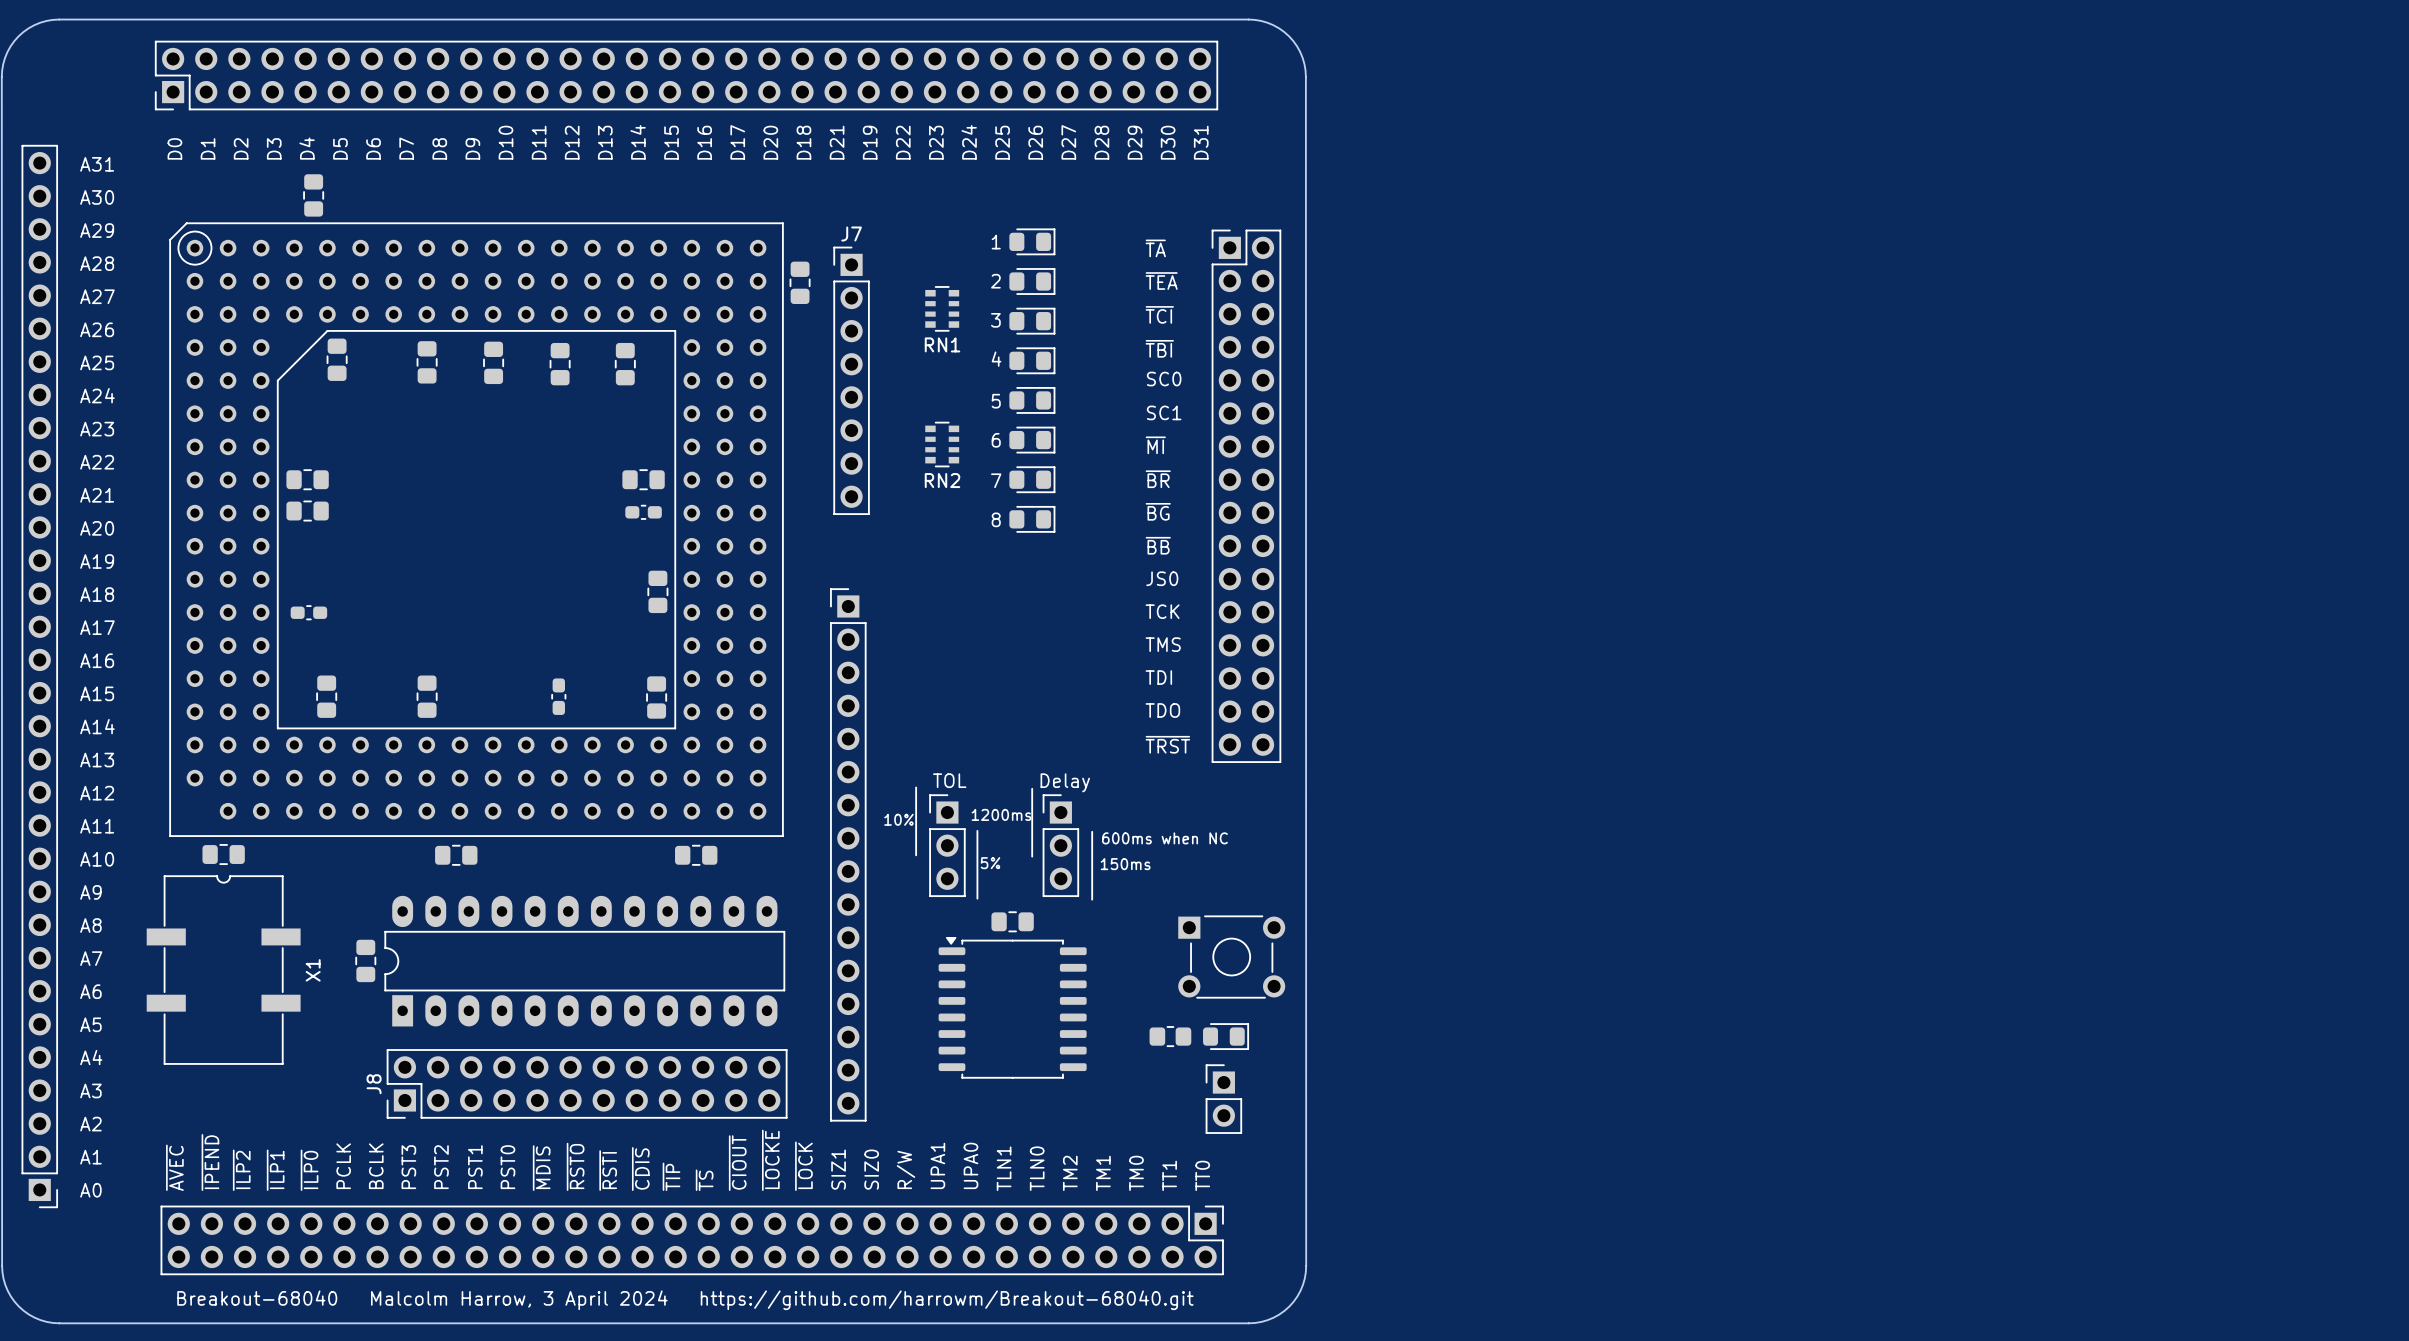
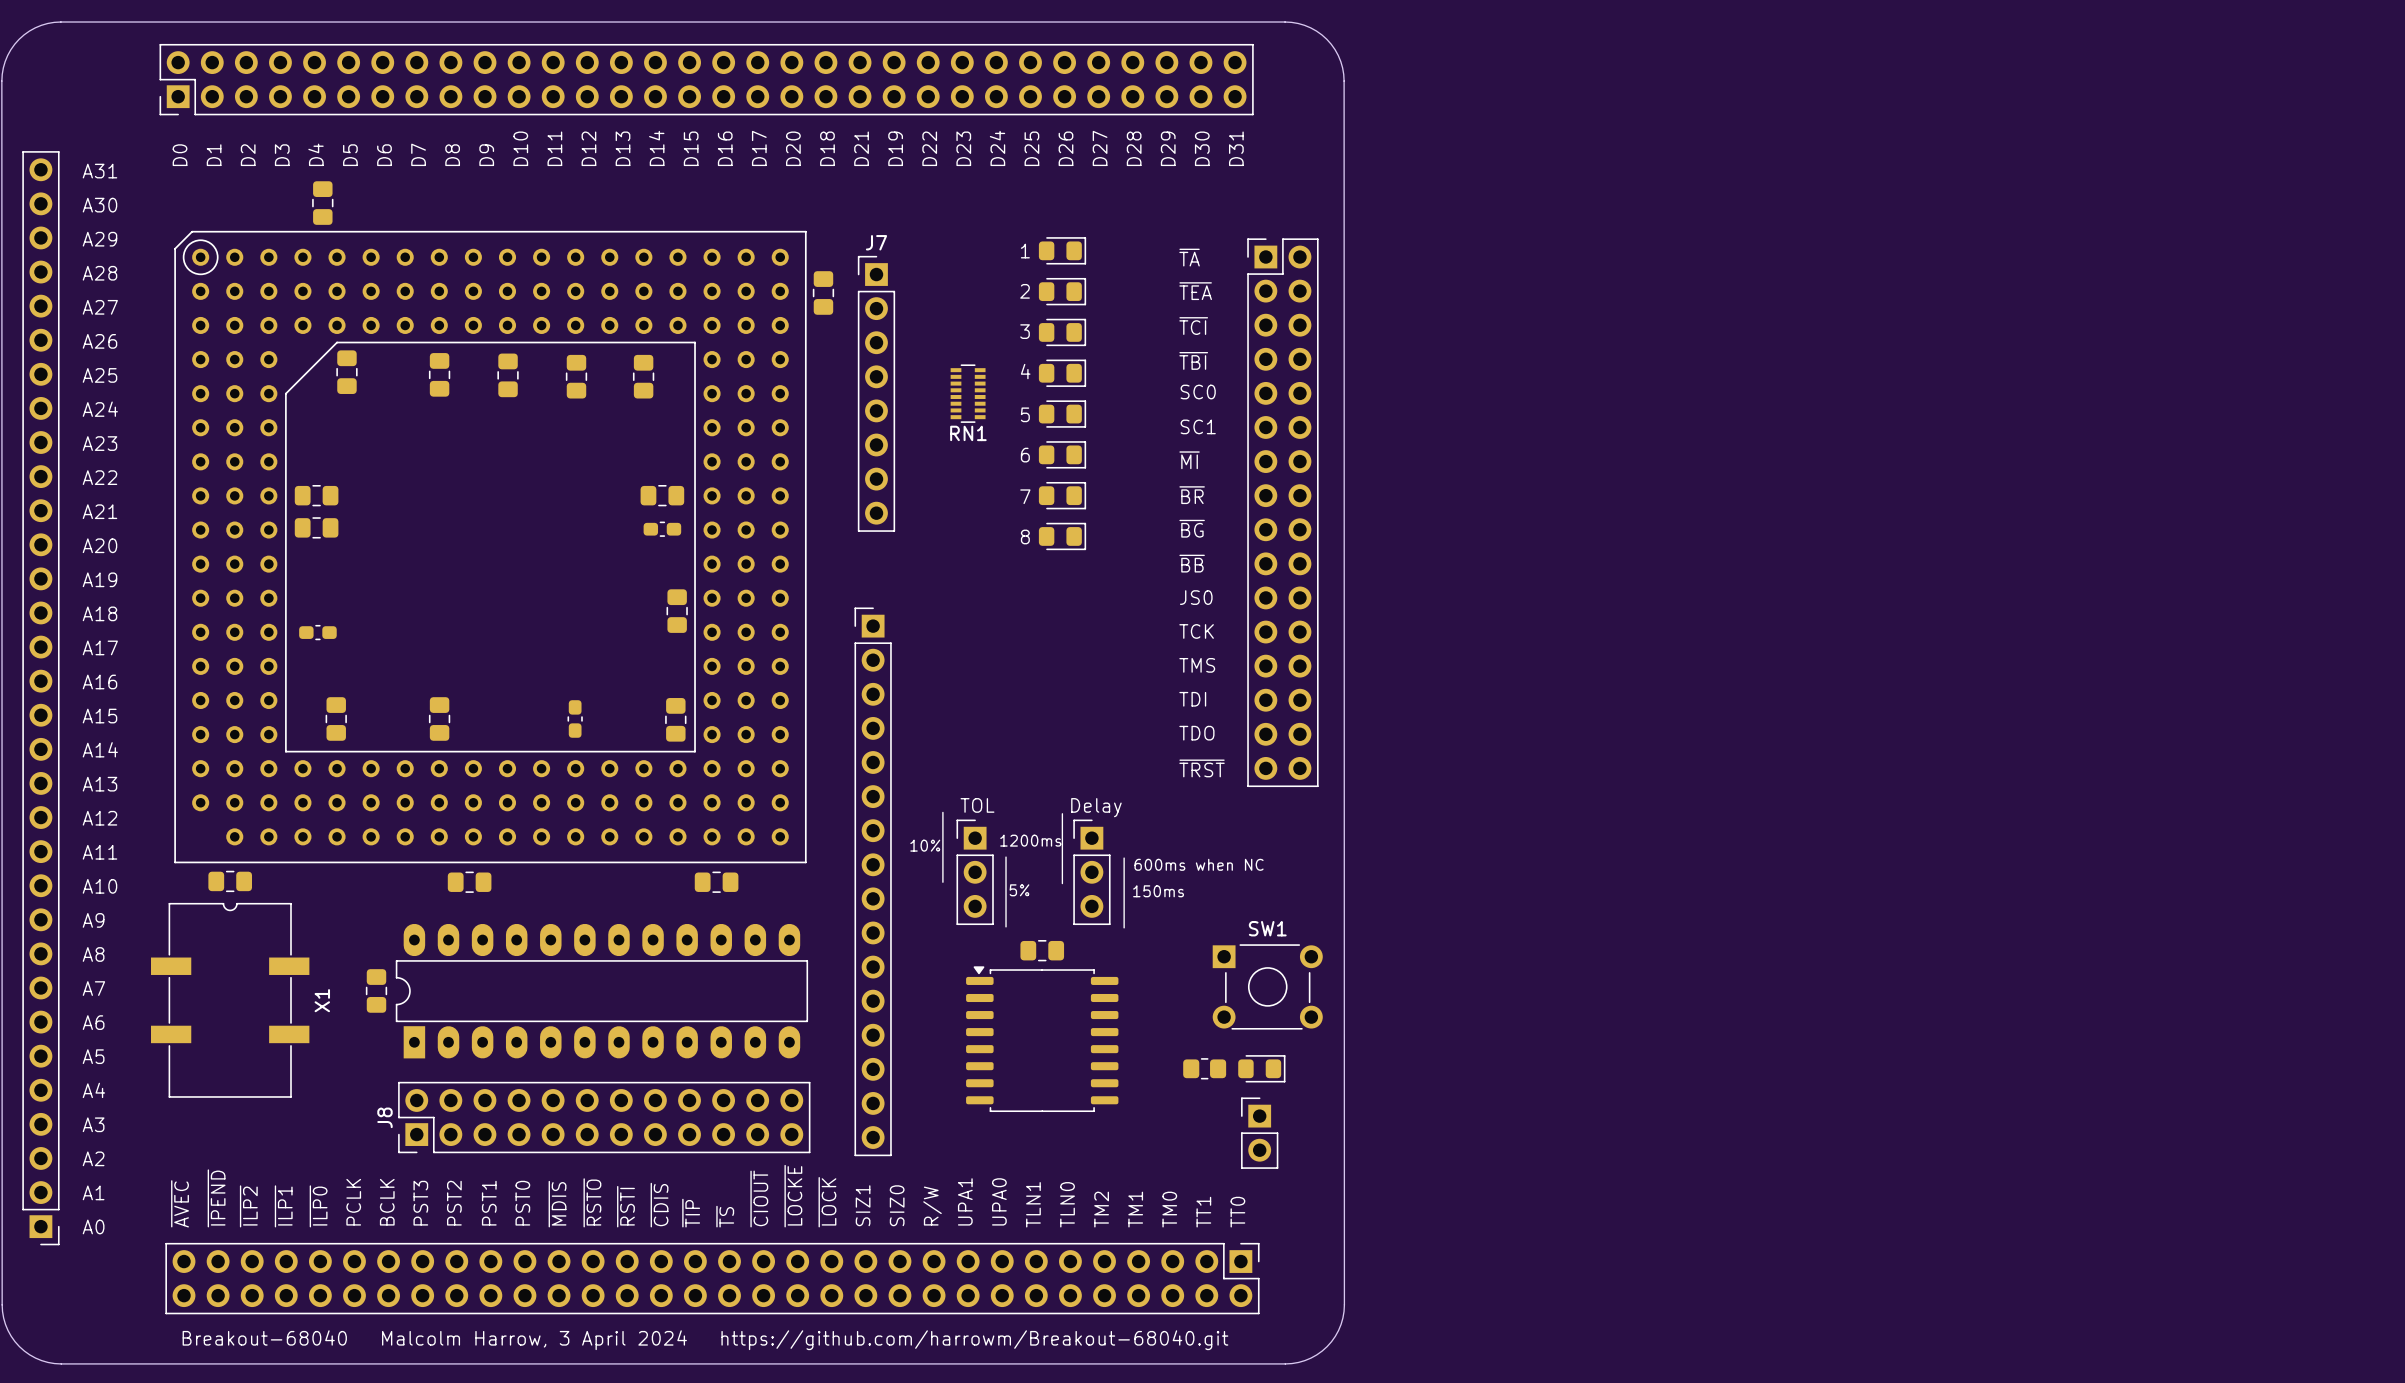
RN1 footprint: [925, 286, 960, 332] -> [950, 364, 986, 423]
RN2: (942, 444) -> none
SW1 name: none -> SW1 (1267, 928)

